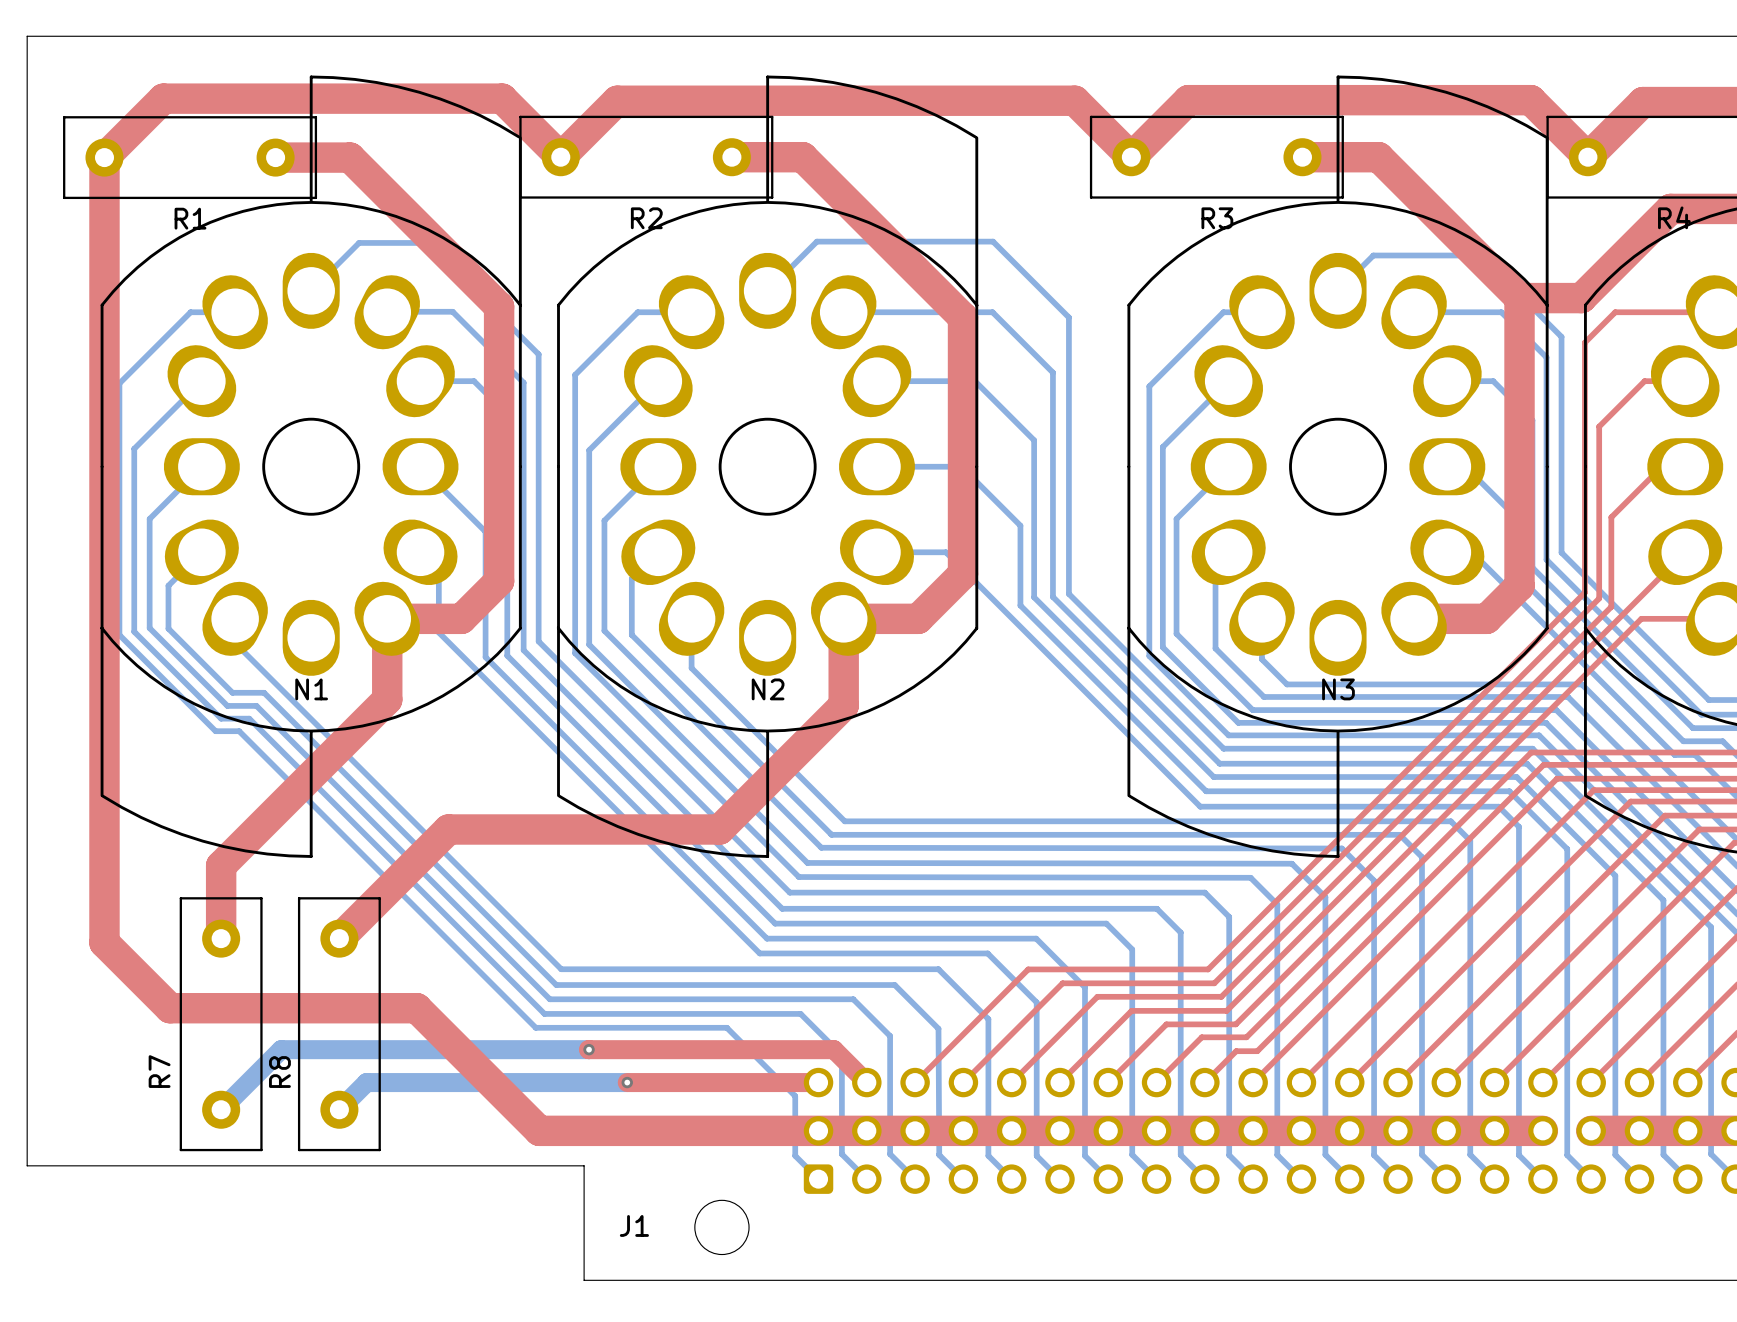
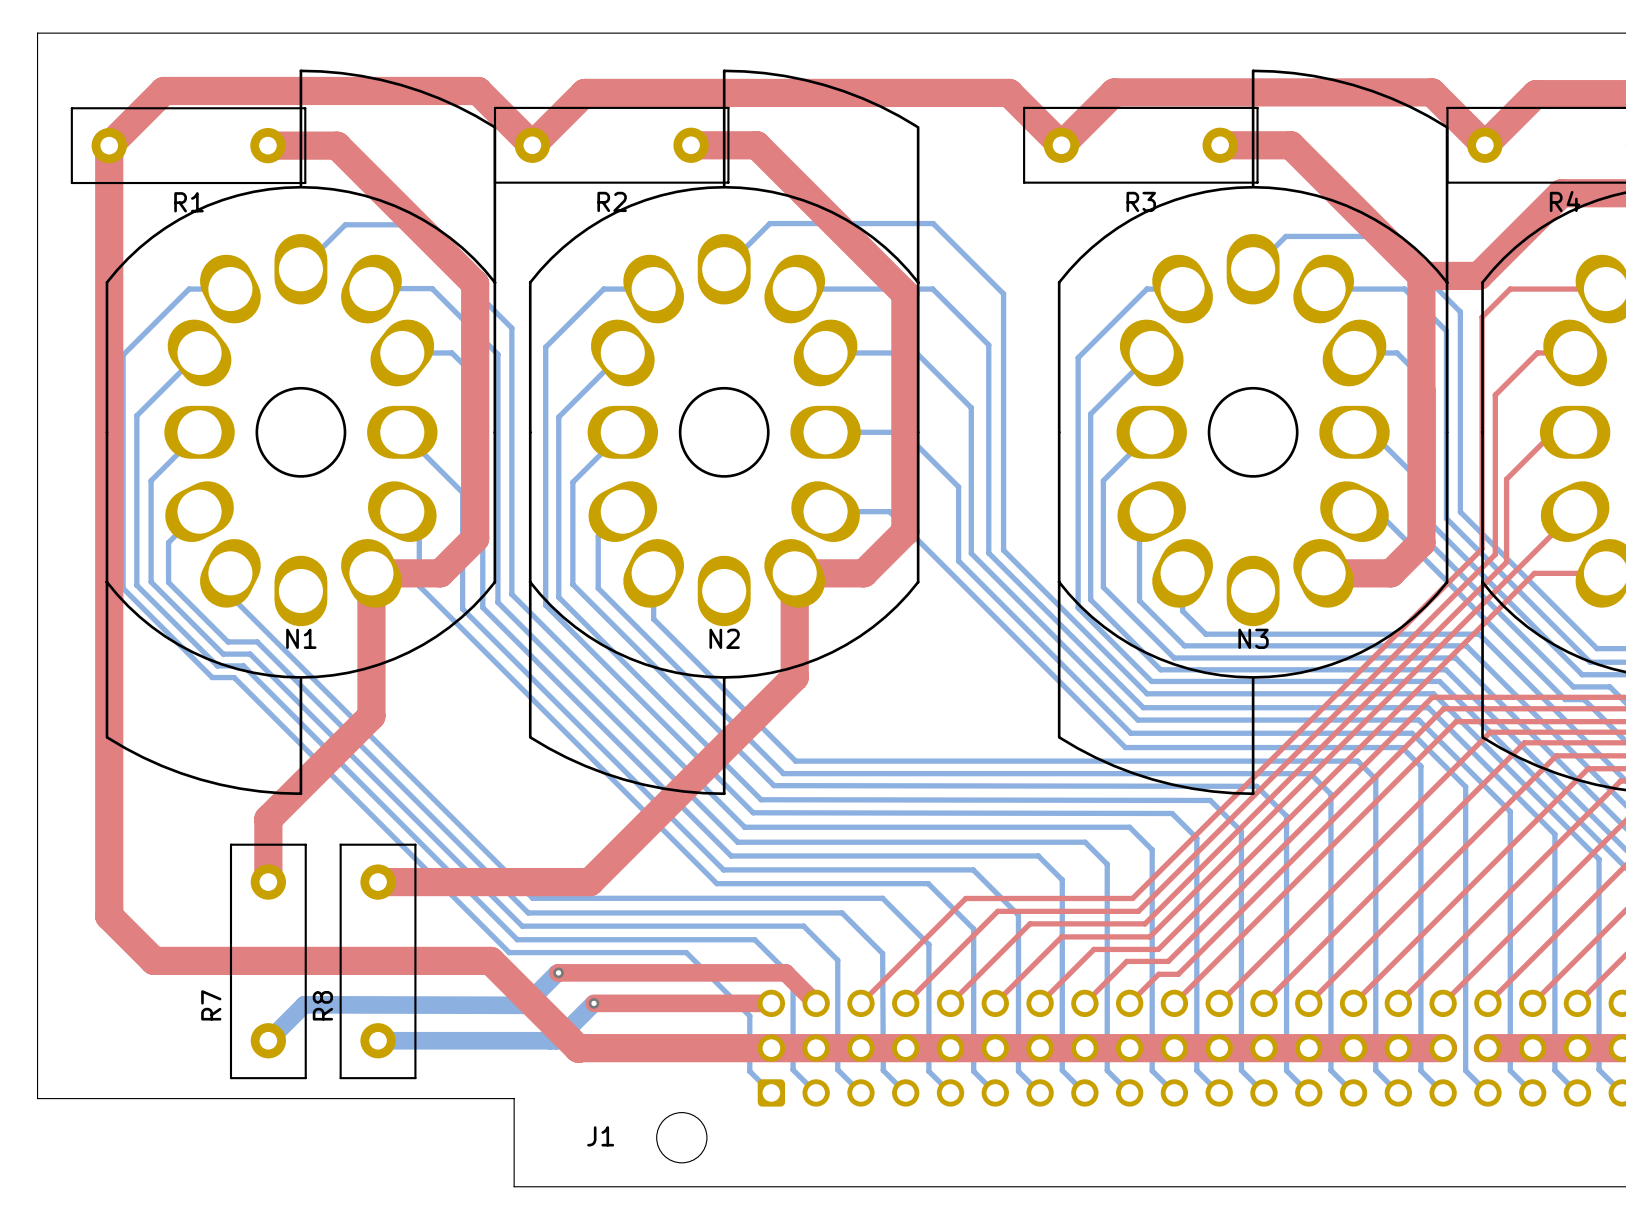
top track: (387, 699) (221, 865) (221, 938) -> (371, 648) (371, 716) (268, 819) (268, 882)
top track: (843, 705) (719, 829) (448, 829) (339, 938) -> (794, 653) (794, 677) (589, 882) (378, 882)
top track: (104, 942) (170, 1008) (416, 1008) (539, 1130) (611, 1130) -> (109, 873) (109, 916) (153, 960) (490, 960) (579, 1048)
R7 position: (221, 1024) -> (268, 961)
R8 position: (339, 1024) -> (378, 961)
bottom track: (589, 1049) (281, 1049) (221, 1109) -> none
bottom track: none -> (557, 973) (525, 1005) (304, 1004) (268, 1040)
bottom track: (627, 1082) (366, 1082) (339, 1109) -> (593, 1003) (556, 1040) (378, 1040)
board edge: (27, 1165) (584, 1165) (584, 1280) -> (37, 1080) (37, 1098) (514, 1098) (514, 1186) (553, 1186)

